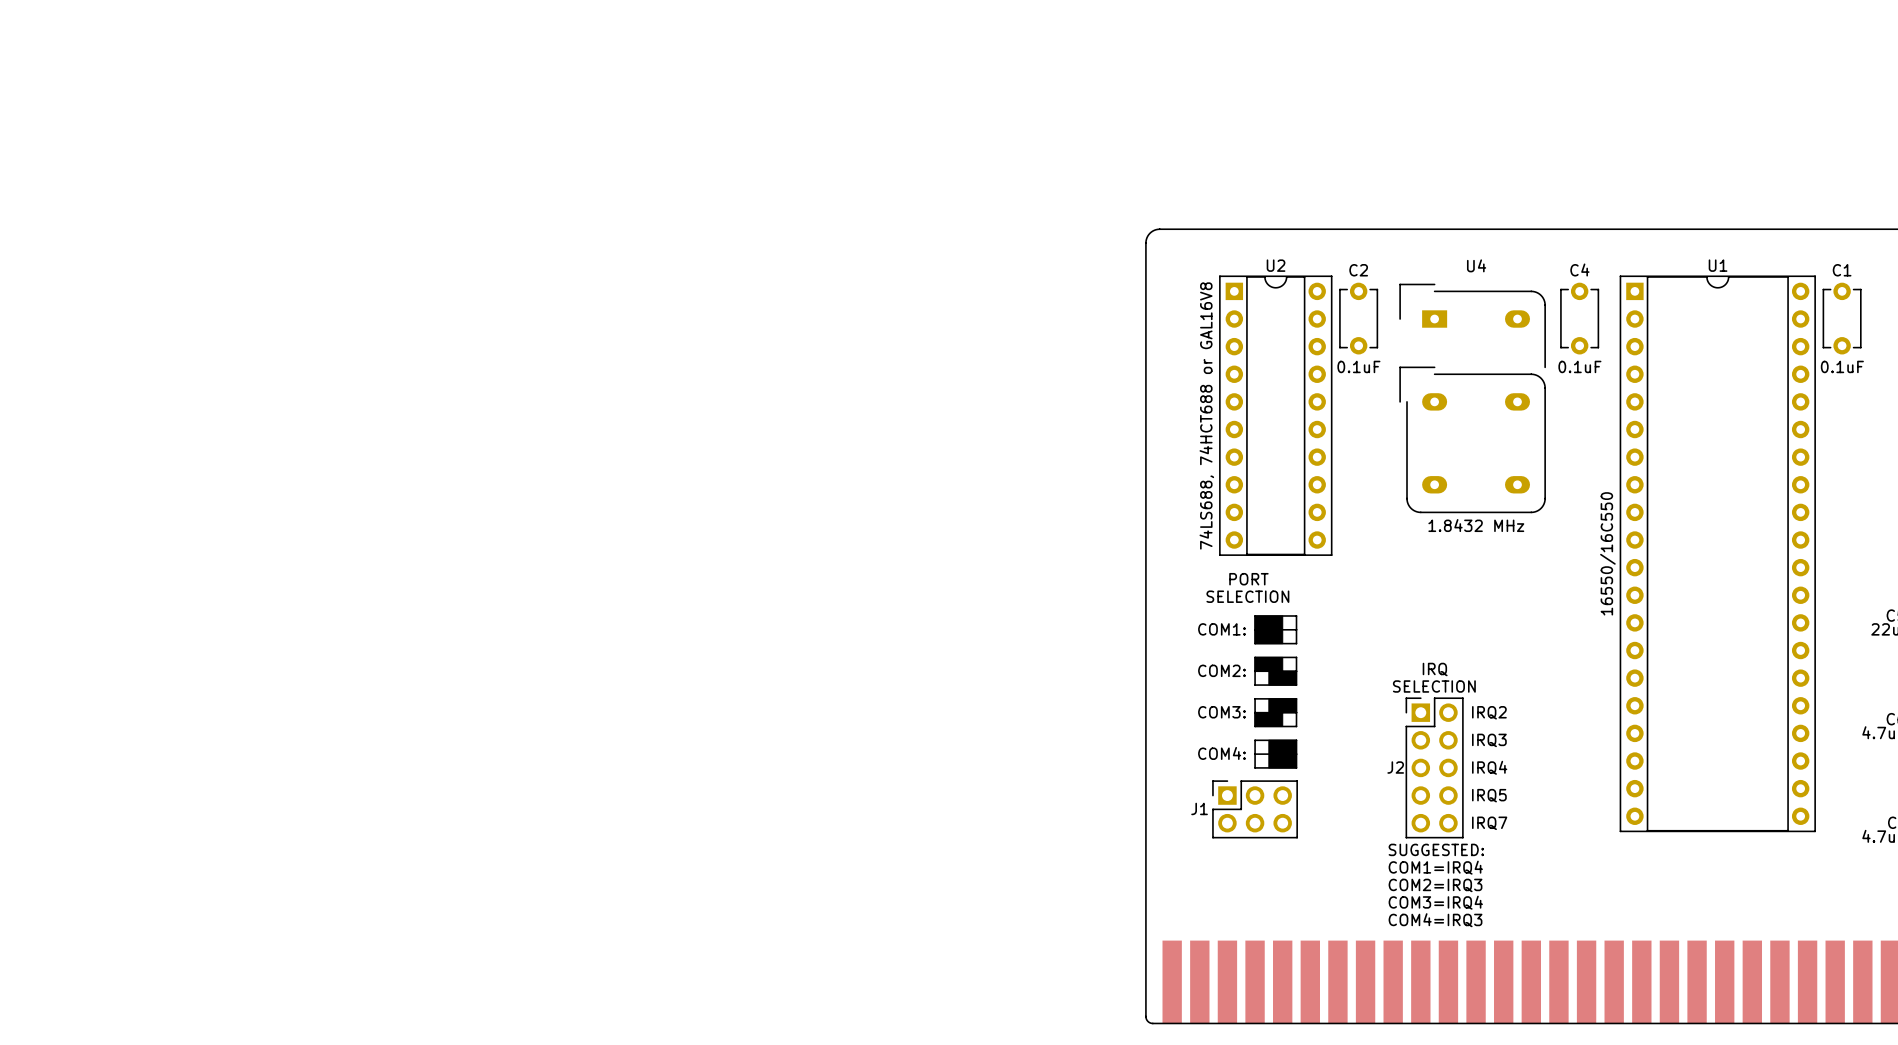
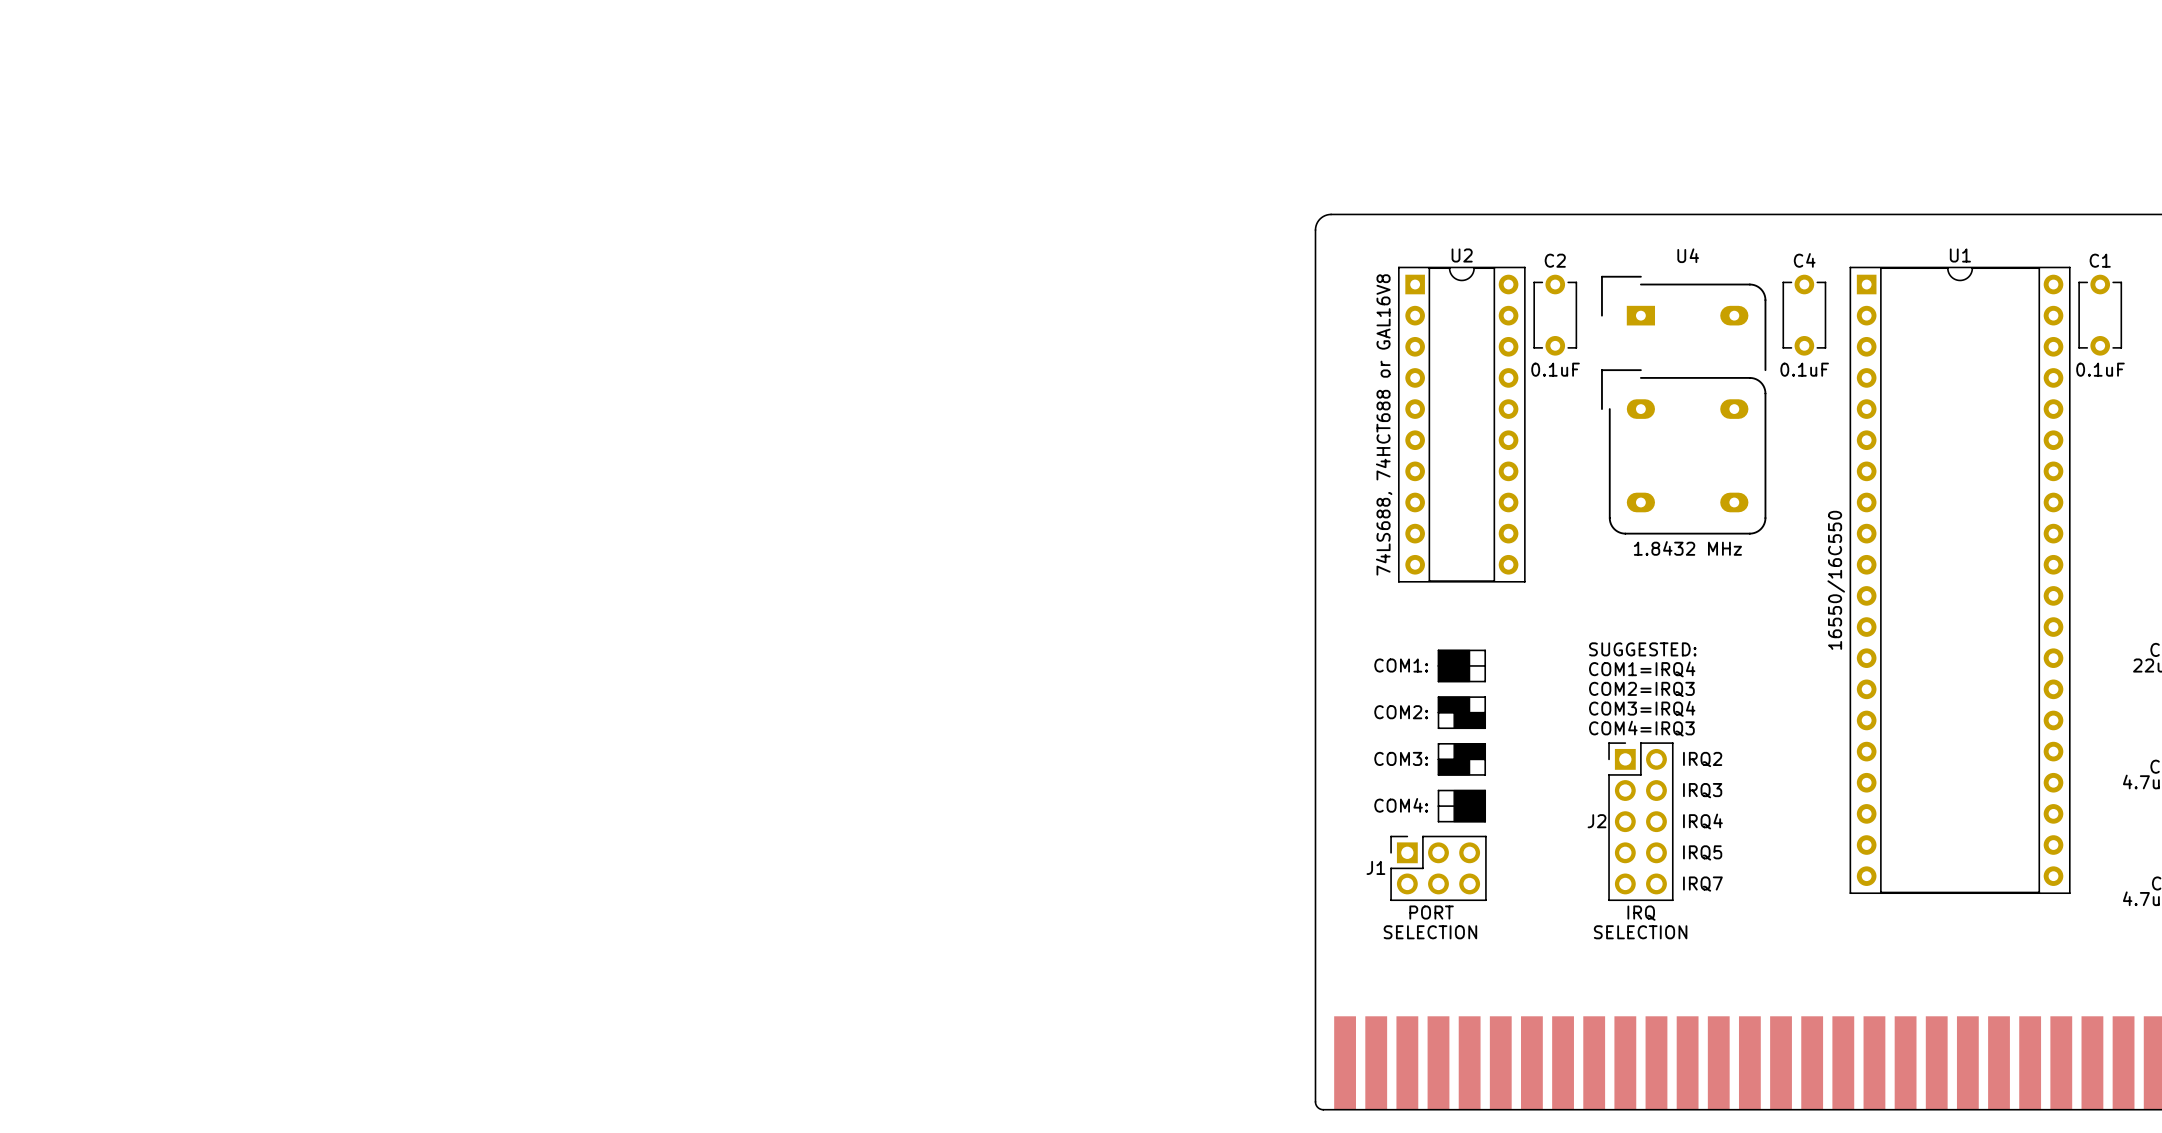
text position: PORT (1248, 579) -> PORT (1431, 912)
text: SELECTION (1247, 596) -> none
text position: IRQ (1435, 669) -> IRQ (1641, 913)
text: SELECTION (1434, 686) -> none
text position: SUGGESTED: (1436, 849) -> SUGGESTED: (1642, 649)
text: none -> SELECTION (1430, 932)
text: none -> SELECTION (1640, 932)
text position: COM1=IRQ4 (1435, 867) -> COM1=IRQ4 (1642, 669)
text position: COM2=IRQ3 (1435, 885) -> COM2=IRQ3 (1641, 689)
text position: COM3=IRQ4 (1435, 902) -> COM3=IRQ4 (1642, 708)
text position: COM4=IRQ3 (1435, 920) -> COM4=IRQ3 (1641, 728)

